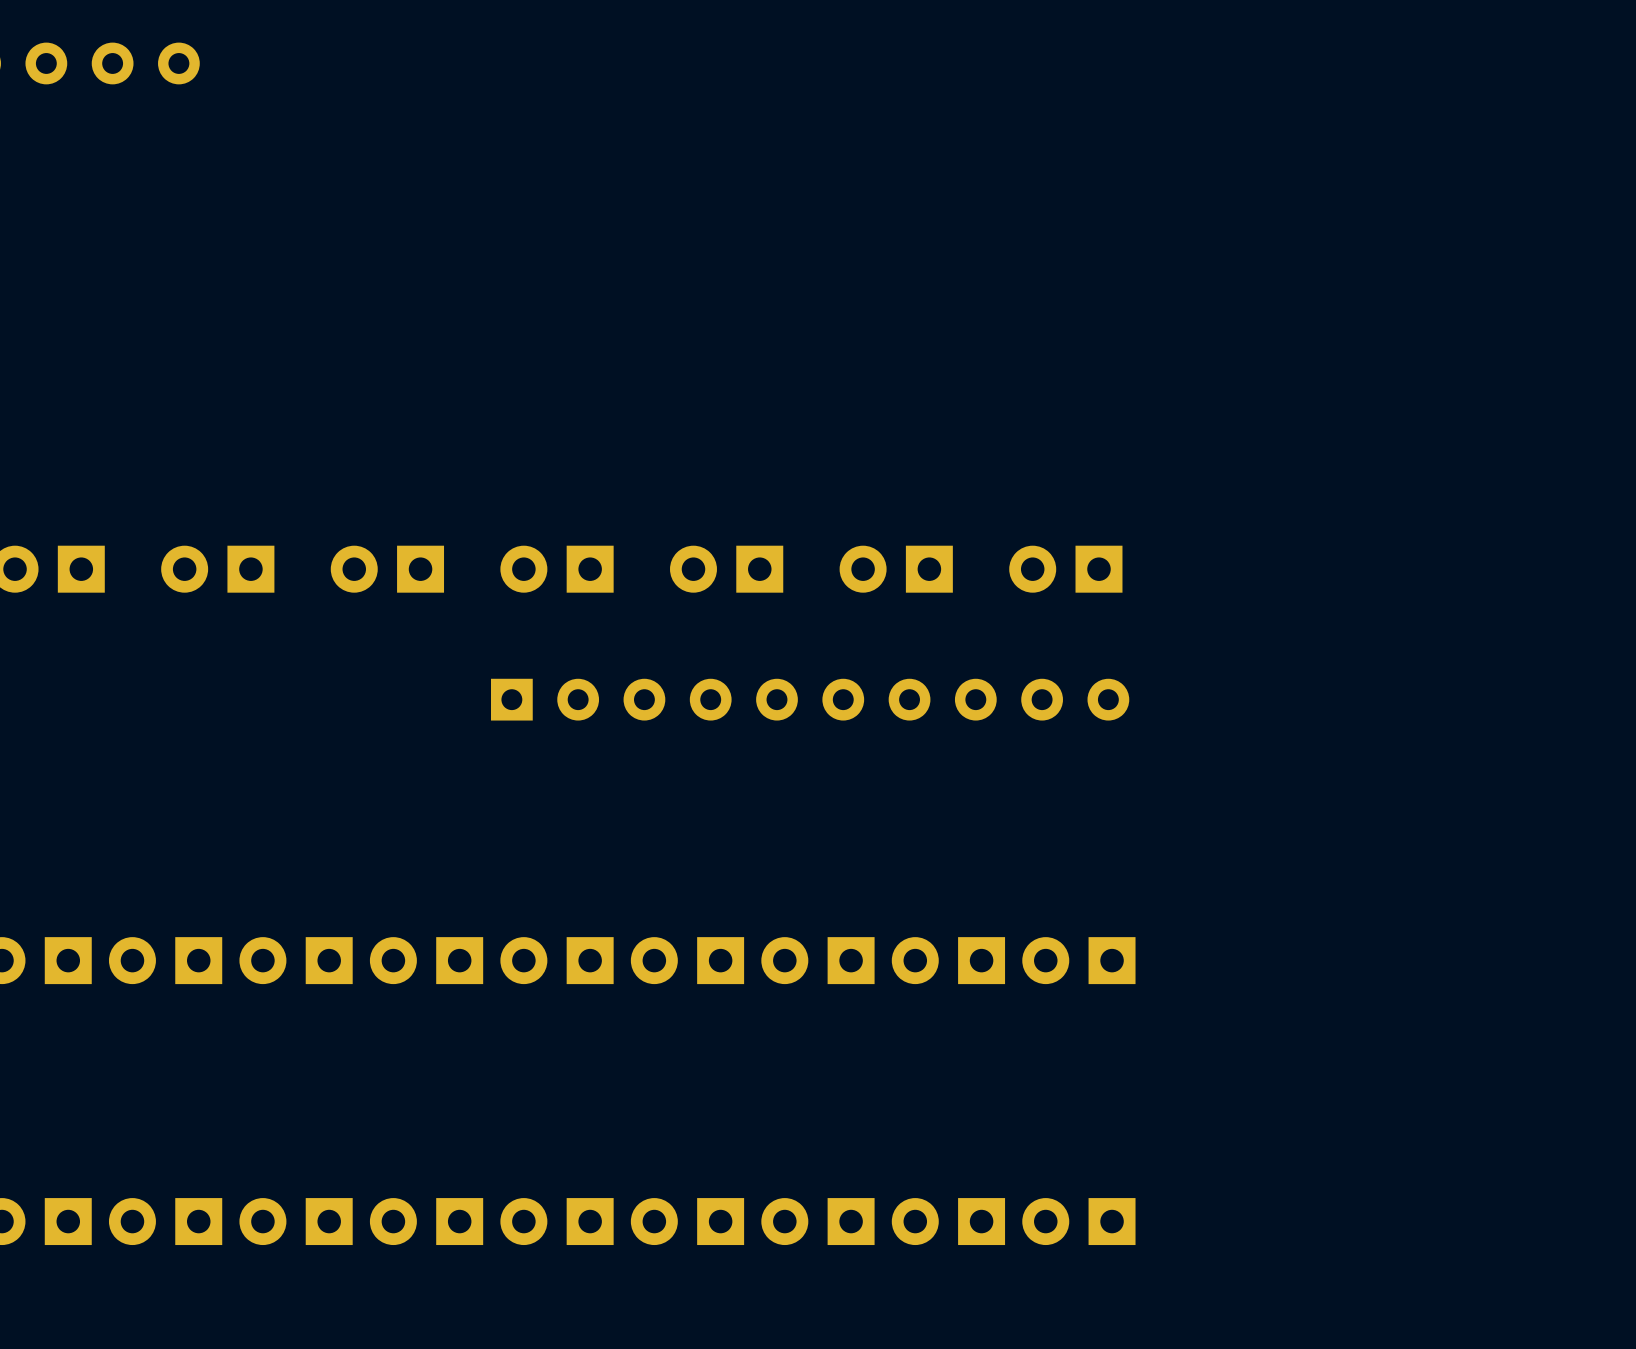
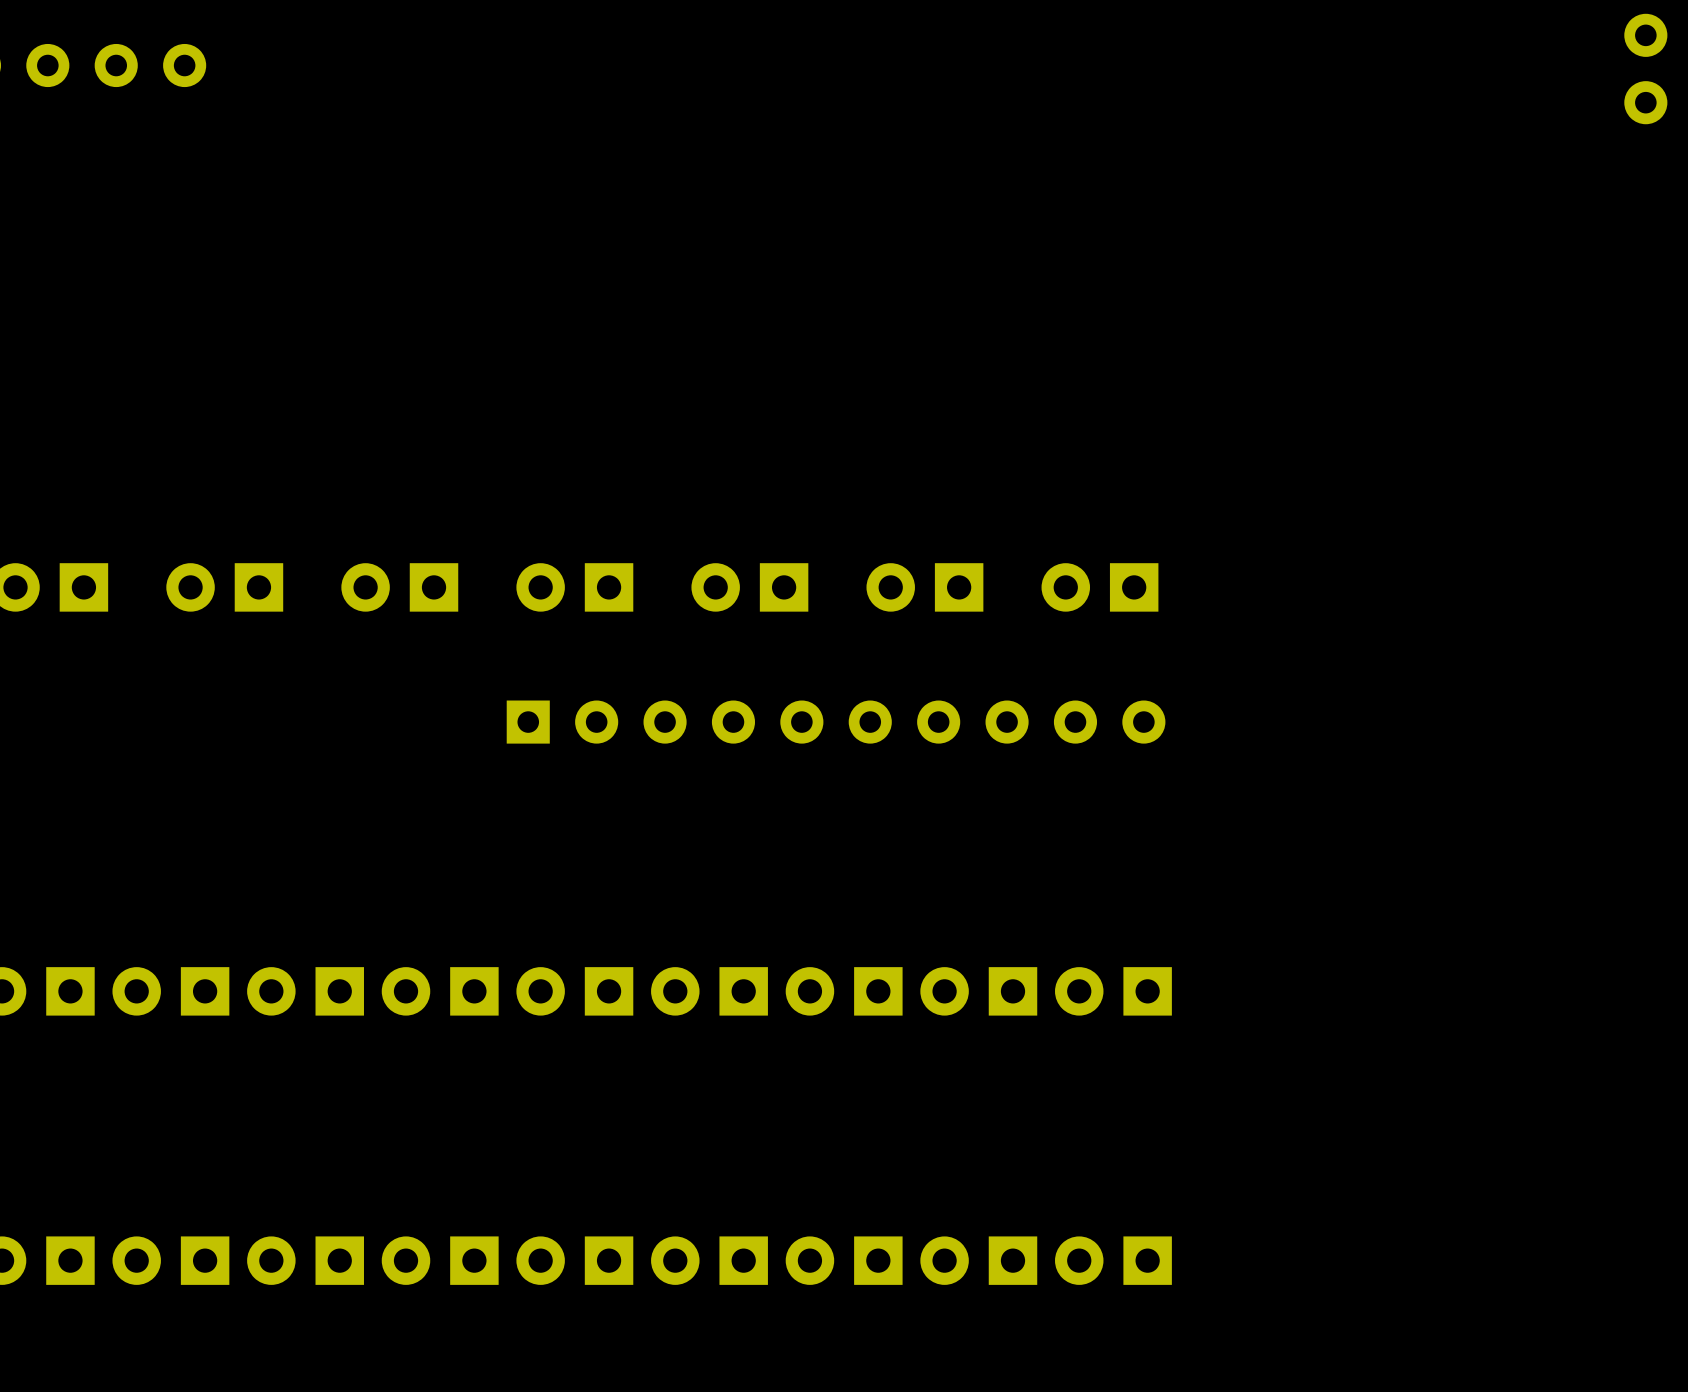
part: none -> (1645, 69)

